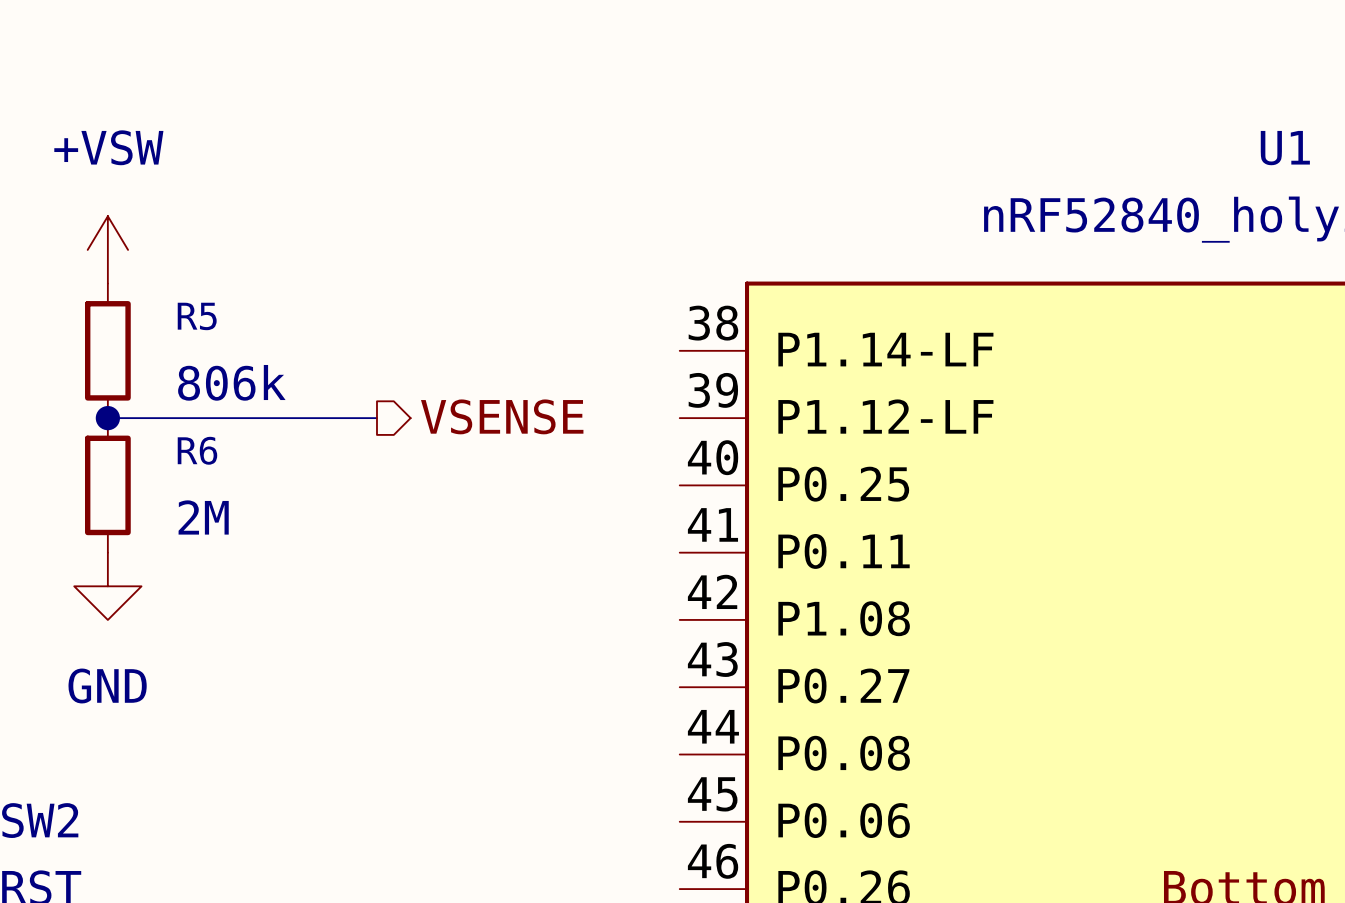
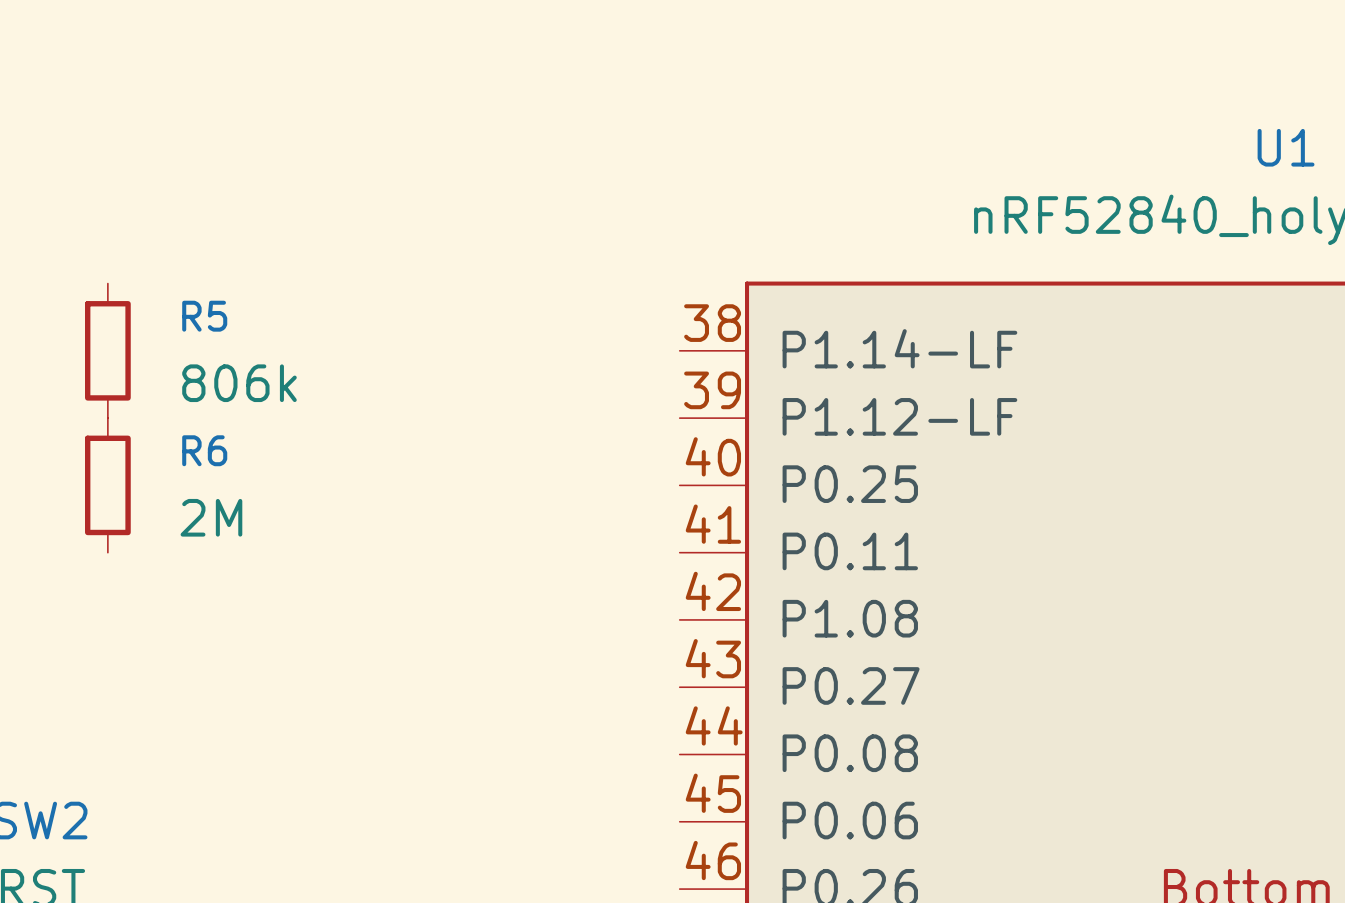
power symbol: +VSW (107, 249) -> none
hierarchical label: VSENSE (502, 416) -> none
wire: (107, 418) (376, 418) -> none
junction: (107, 418) -> none
power symbol: GND (107, 586) -> none

